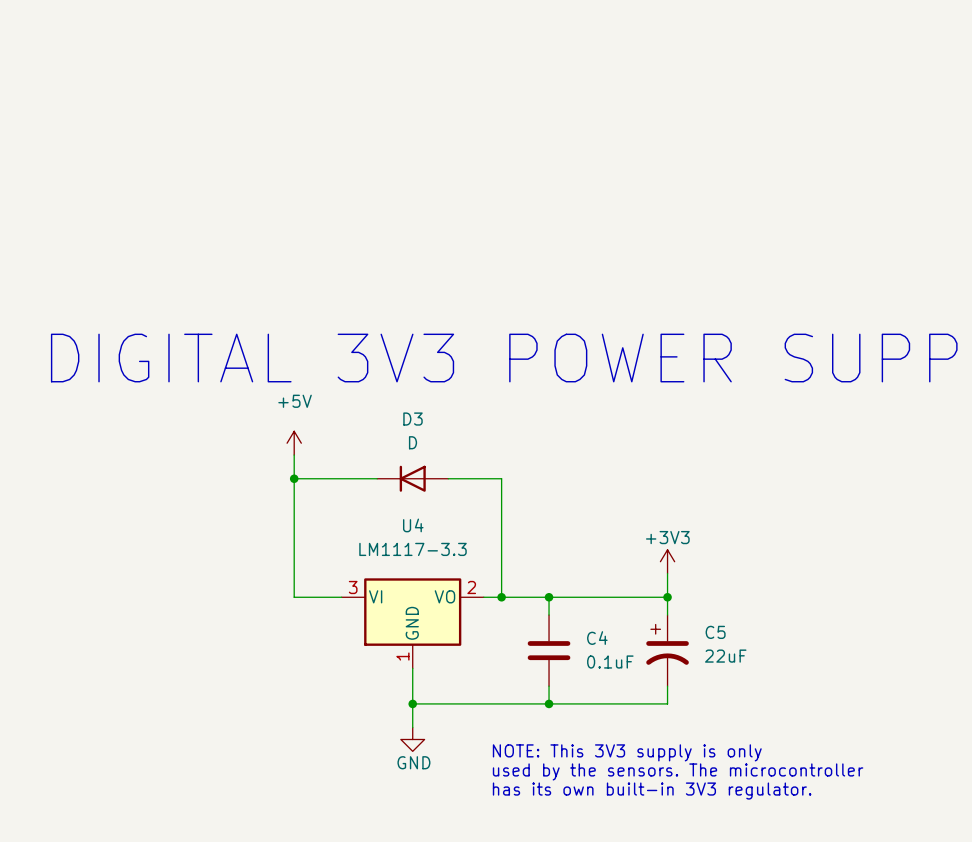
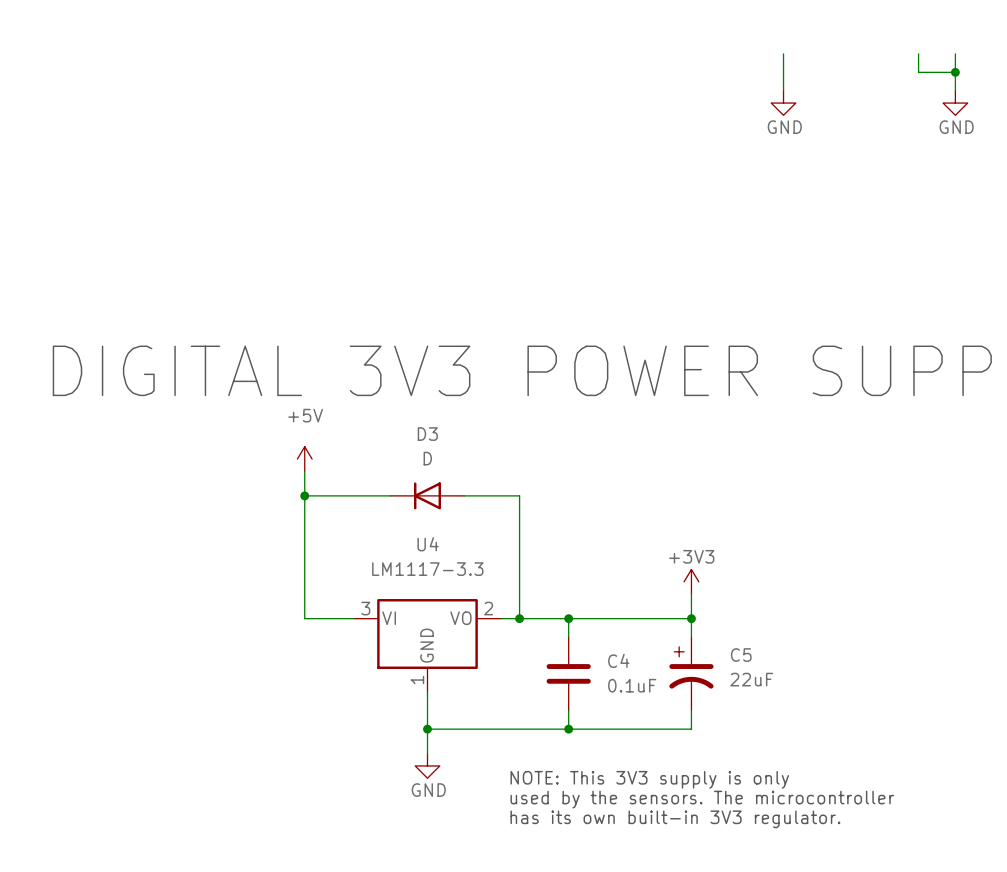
wire: none -> (783, 53) (783, 90)
wire: none -> (918, 53) (918, 72) (955, 72)
wire: none -> (955, 53) (955, 90)
junction: none -> (955, 72)
power symbol: none -> GND (783, 103)
power symbol: none -> GND (955, 103)

